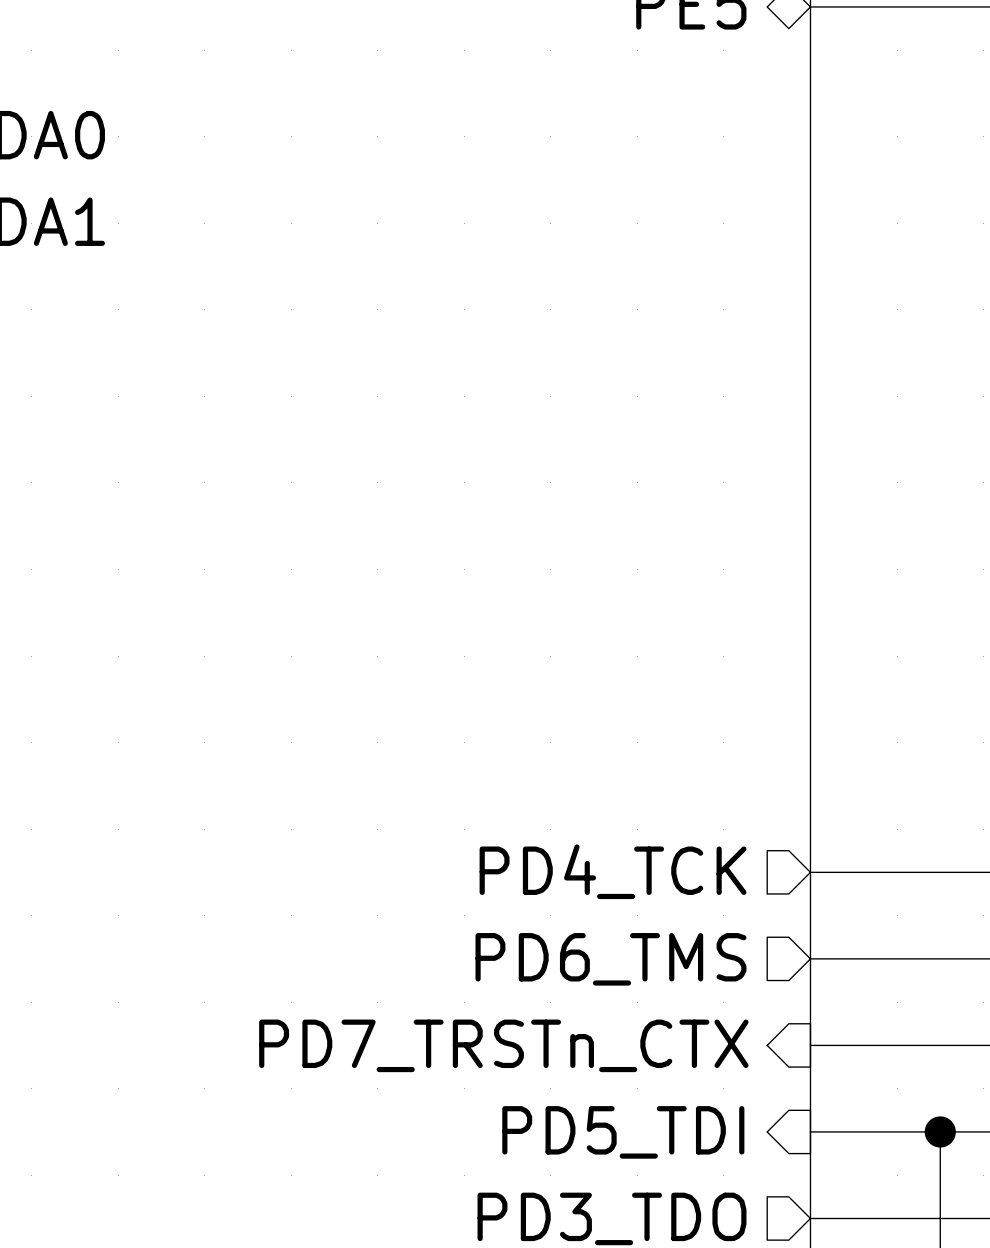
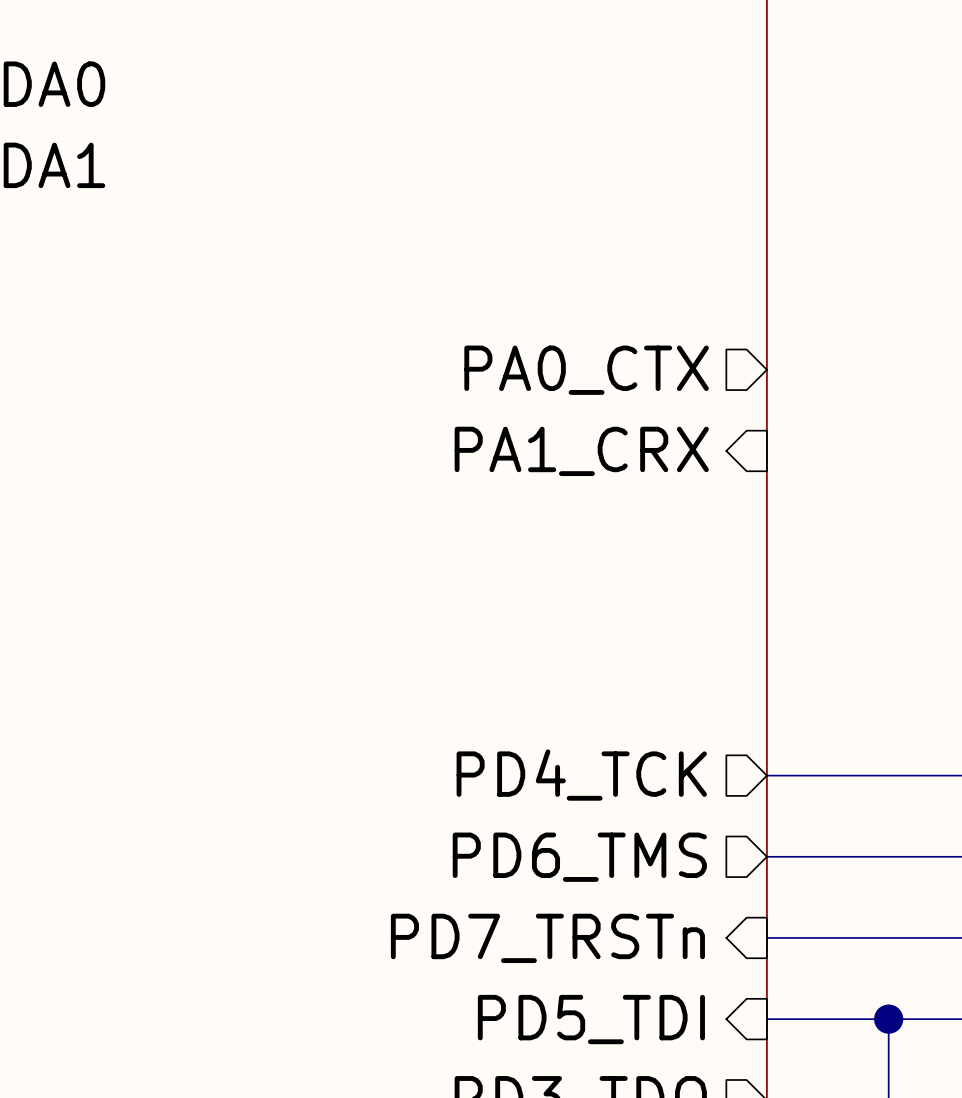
sheet pin: none -> PA0_CTX (586, 370)
sheet pin: none -> PA1_CRX (581, 451)
sheet pin: PD7_TRSTn_CTX (503, 1045) -> PD7_TRSTn (547, 938)

